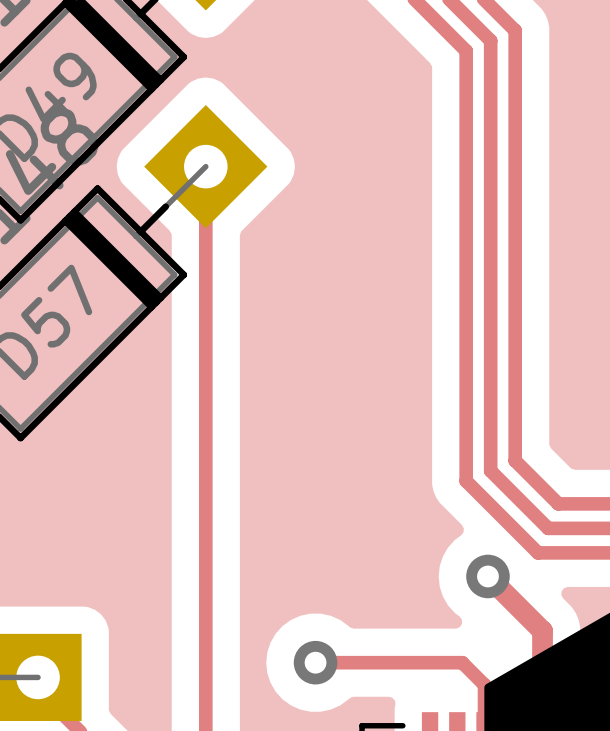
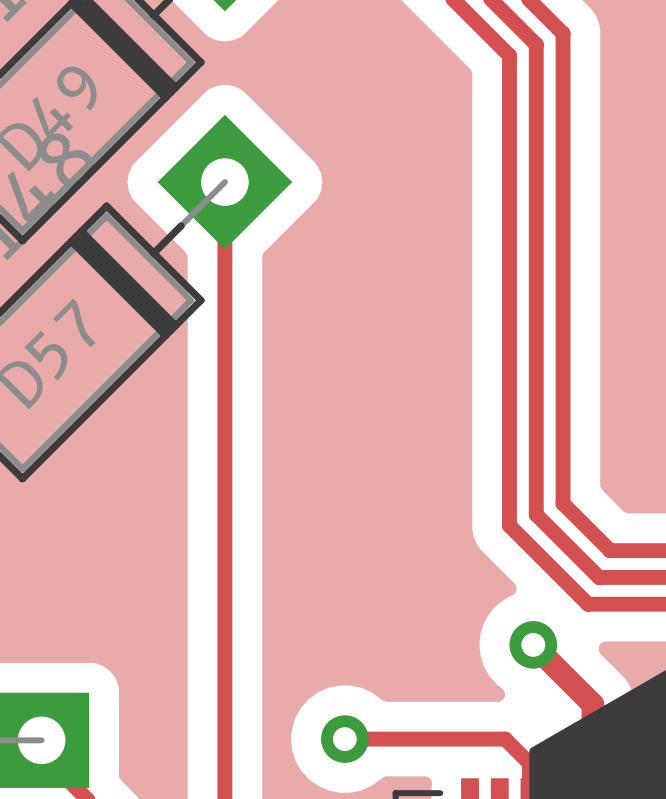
track: (487, 576) (542, 631) (542, 644) -> (533, 644) (592, 704)
via position: (487, 576) -> (533, 644)
track: (315, 662) (462, 662) (484, 684) (484, 698) -> (344, 739) (505, 739) (529, 763)
via position: (315, 662) -> (344, 739)

